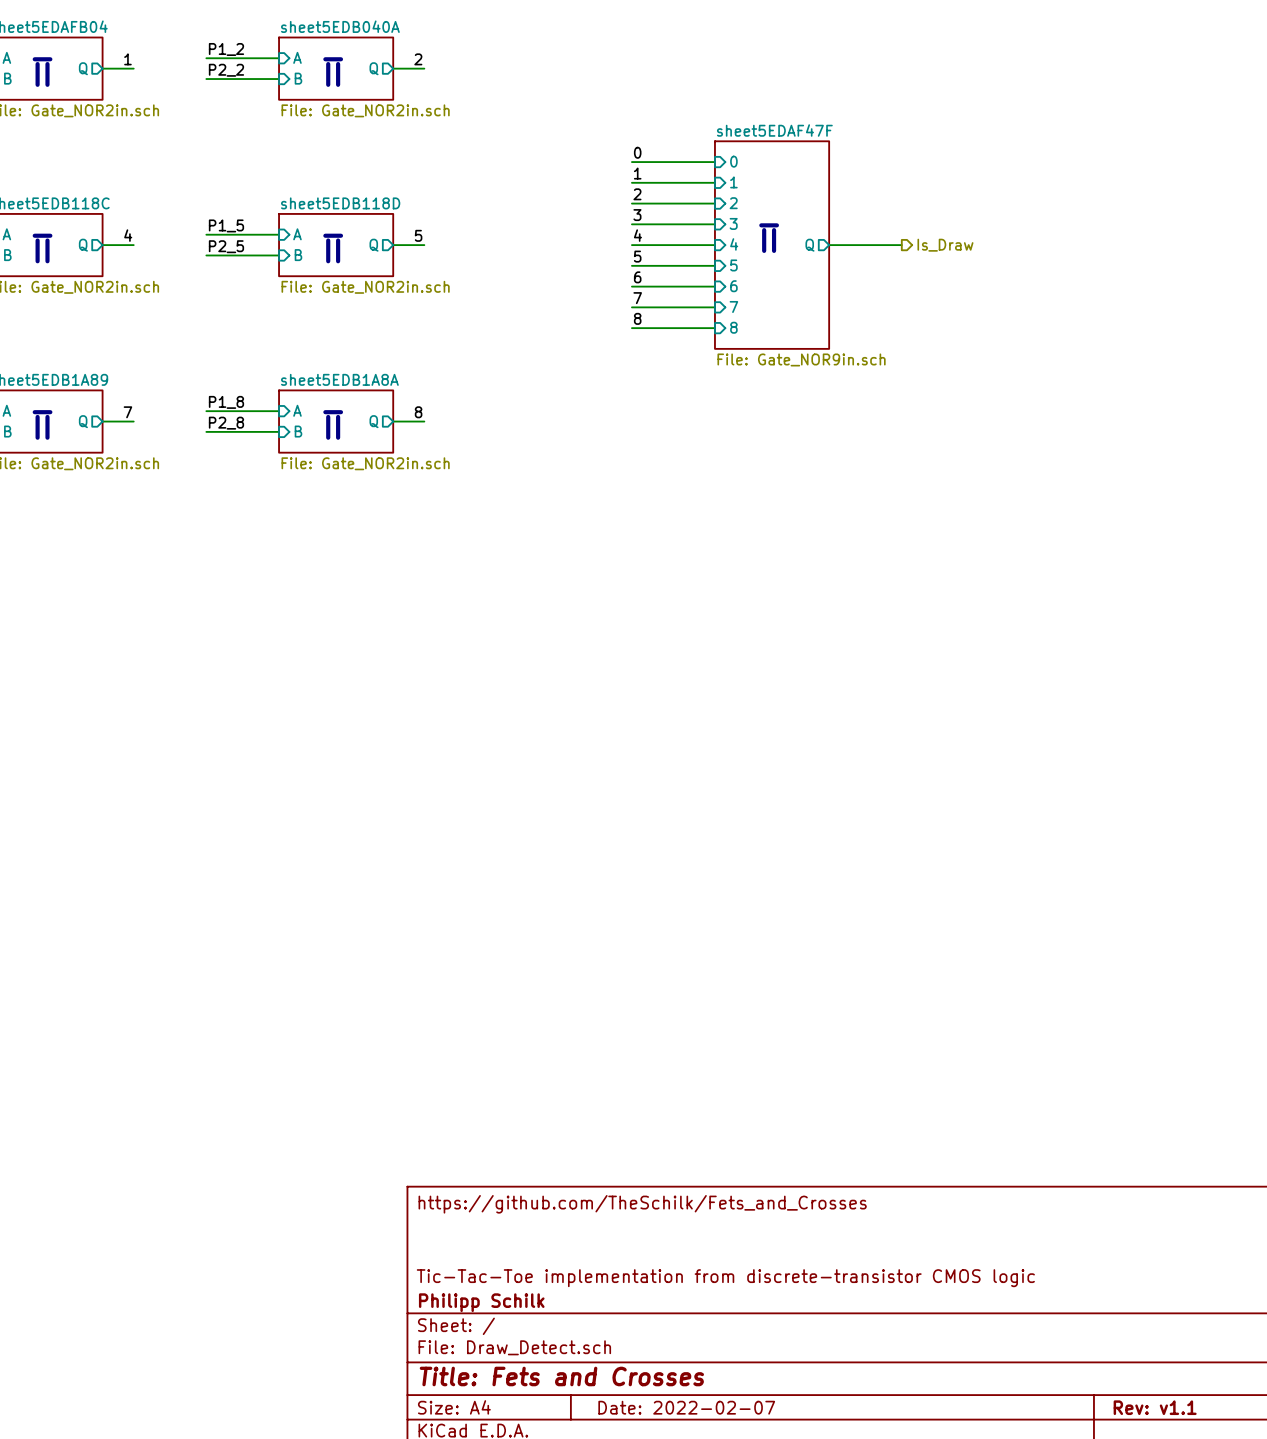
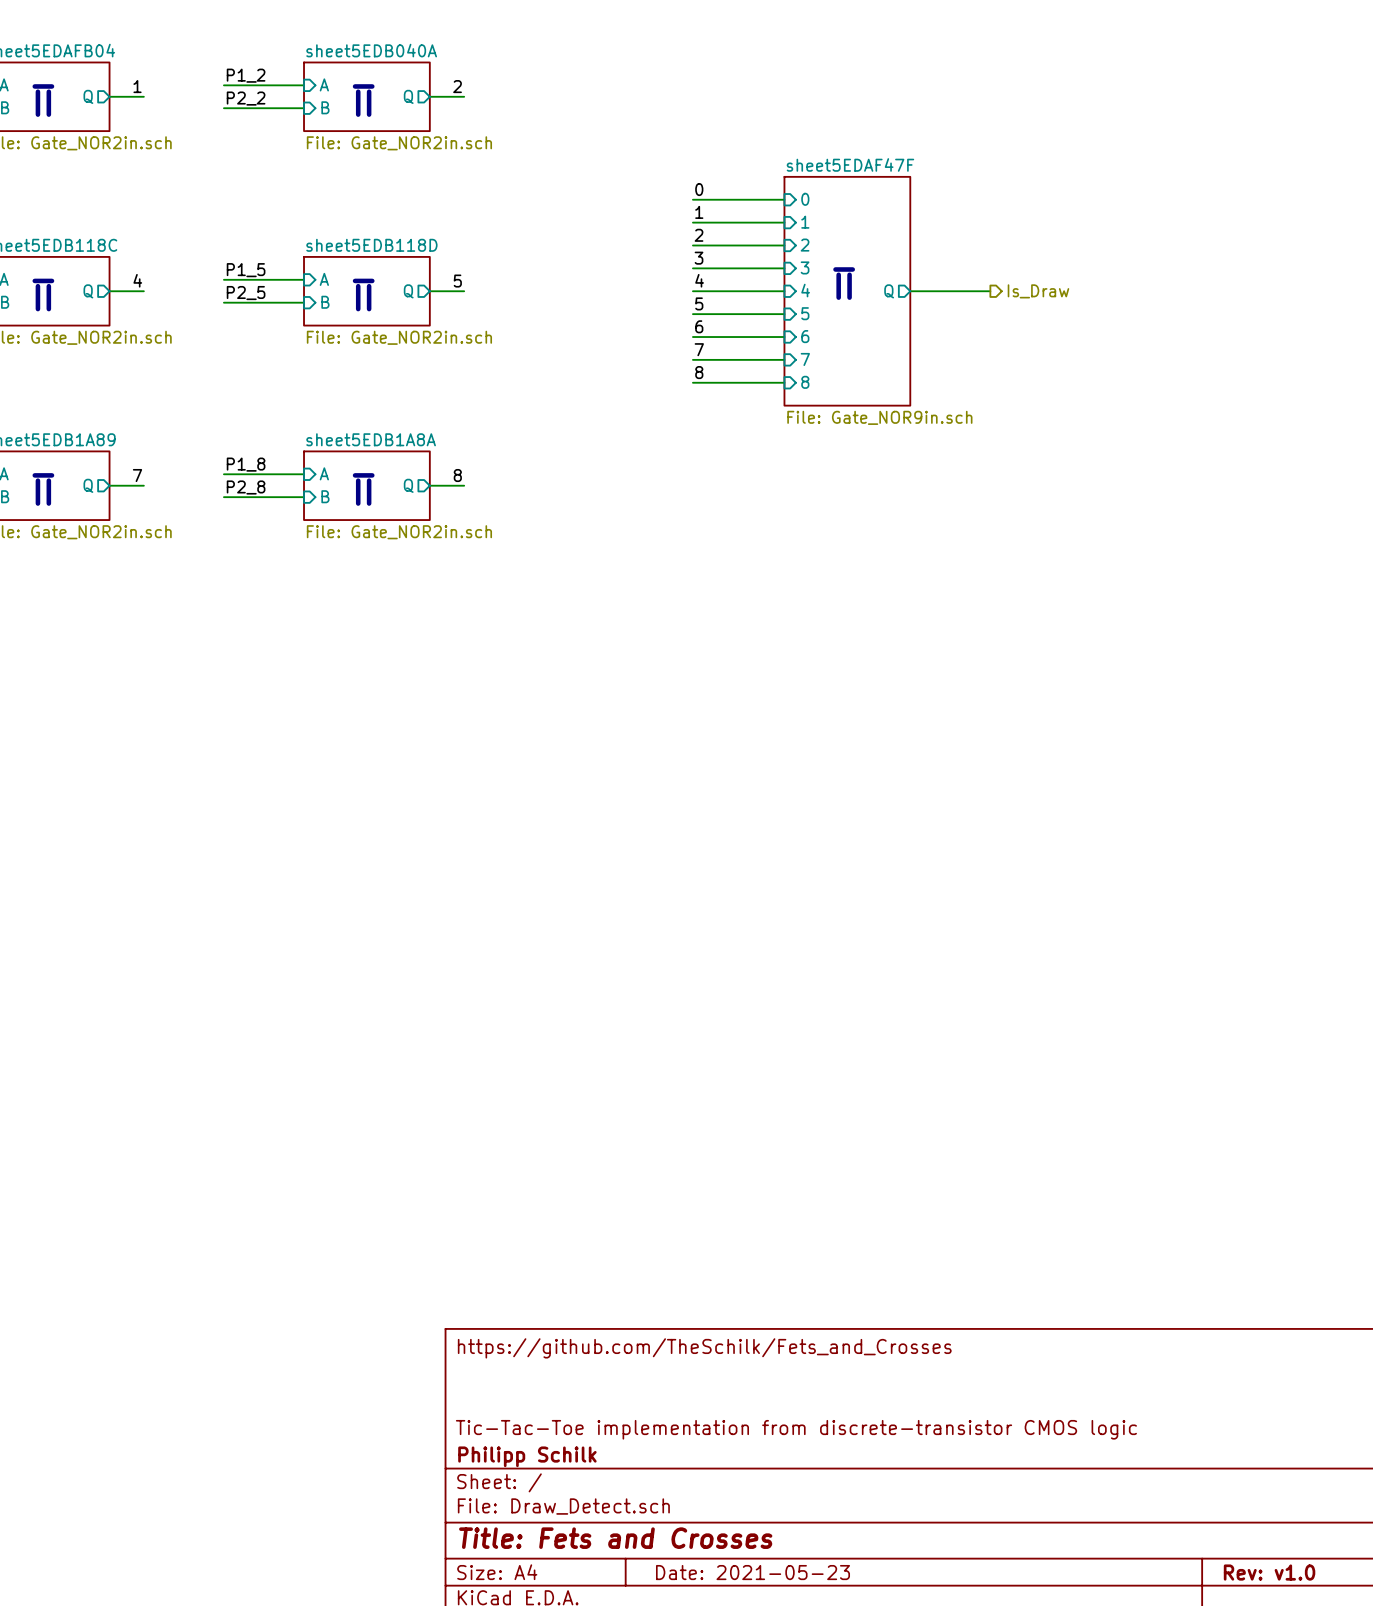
title block: Date: 2022-02-07 (686, 1407) -> Date: 2021-05-23 (753, 1572)
title block: Rev: v1.1 (1155, 1407) -> Rev: v1.0 (1269, 1572)

